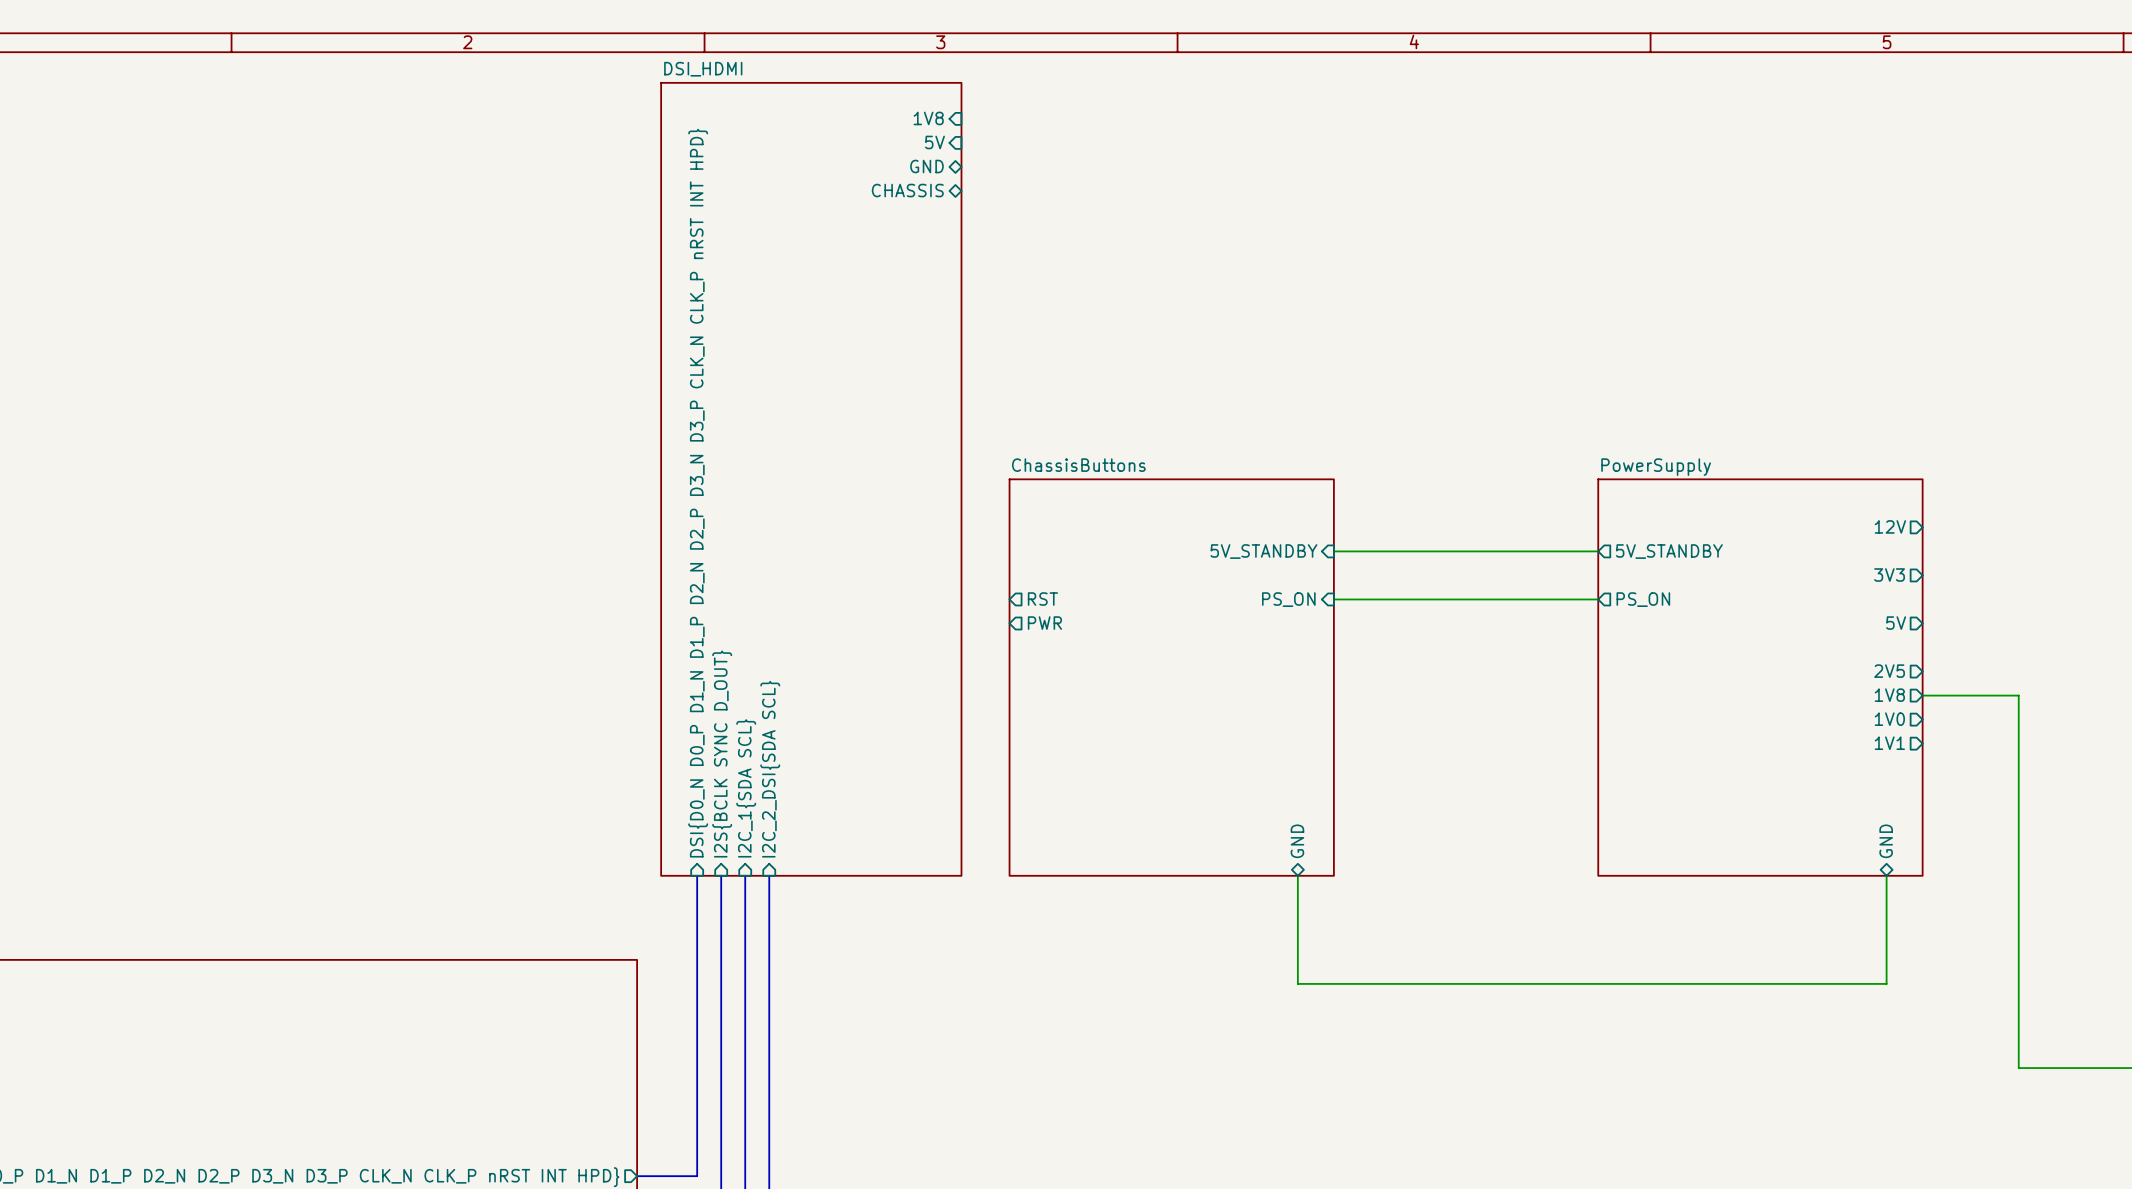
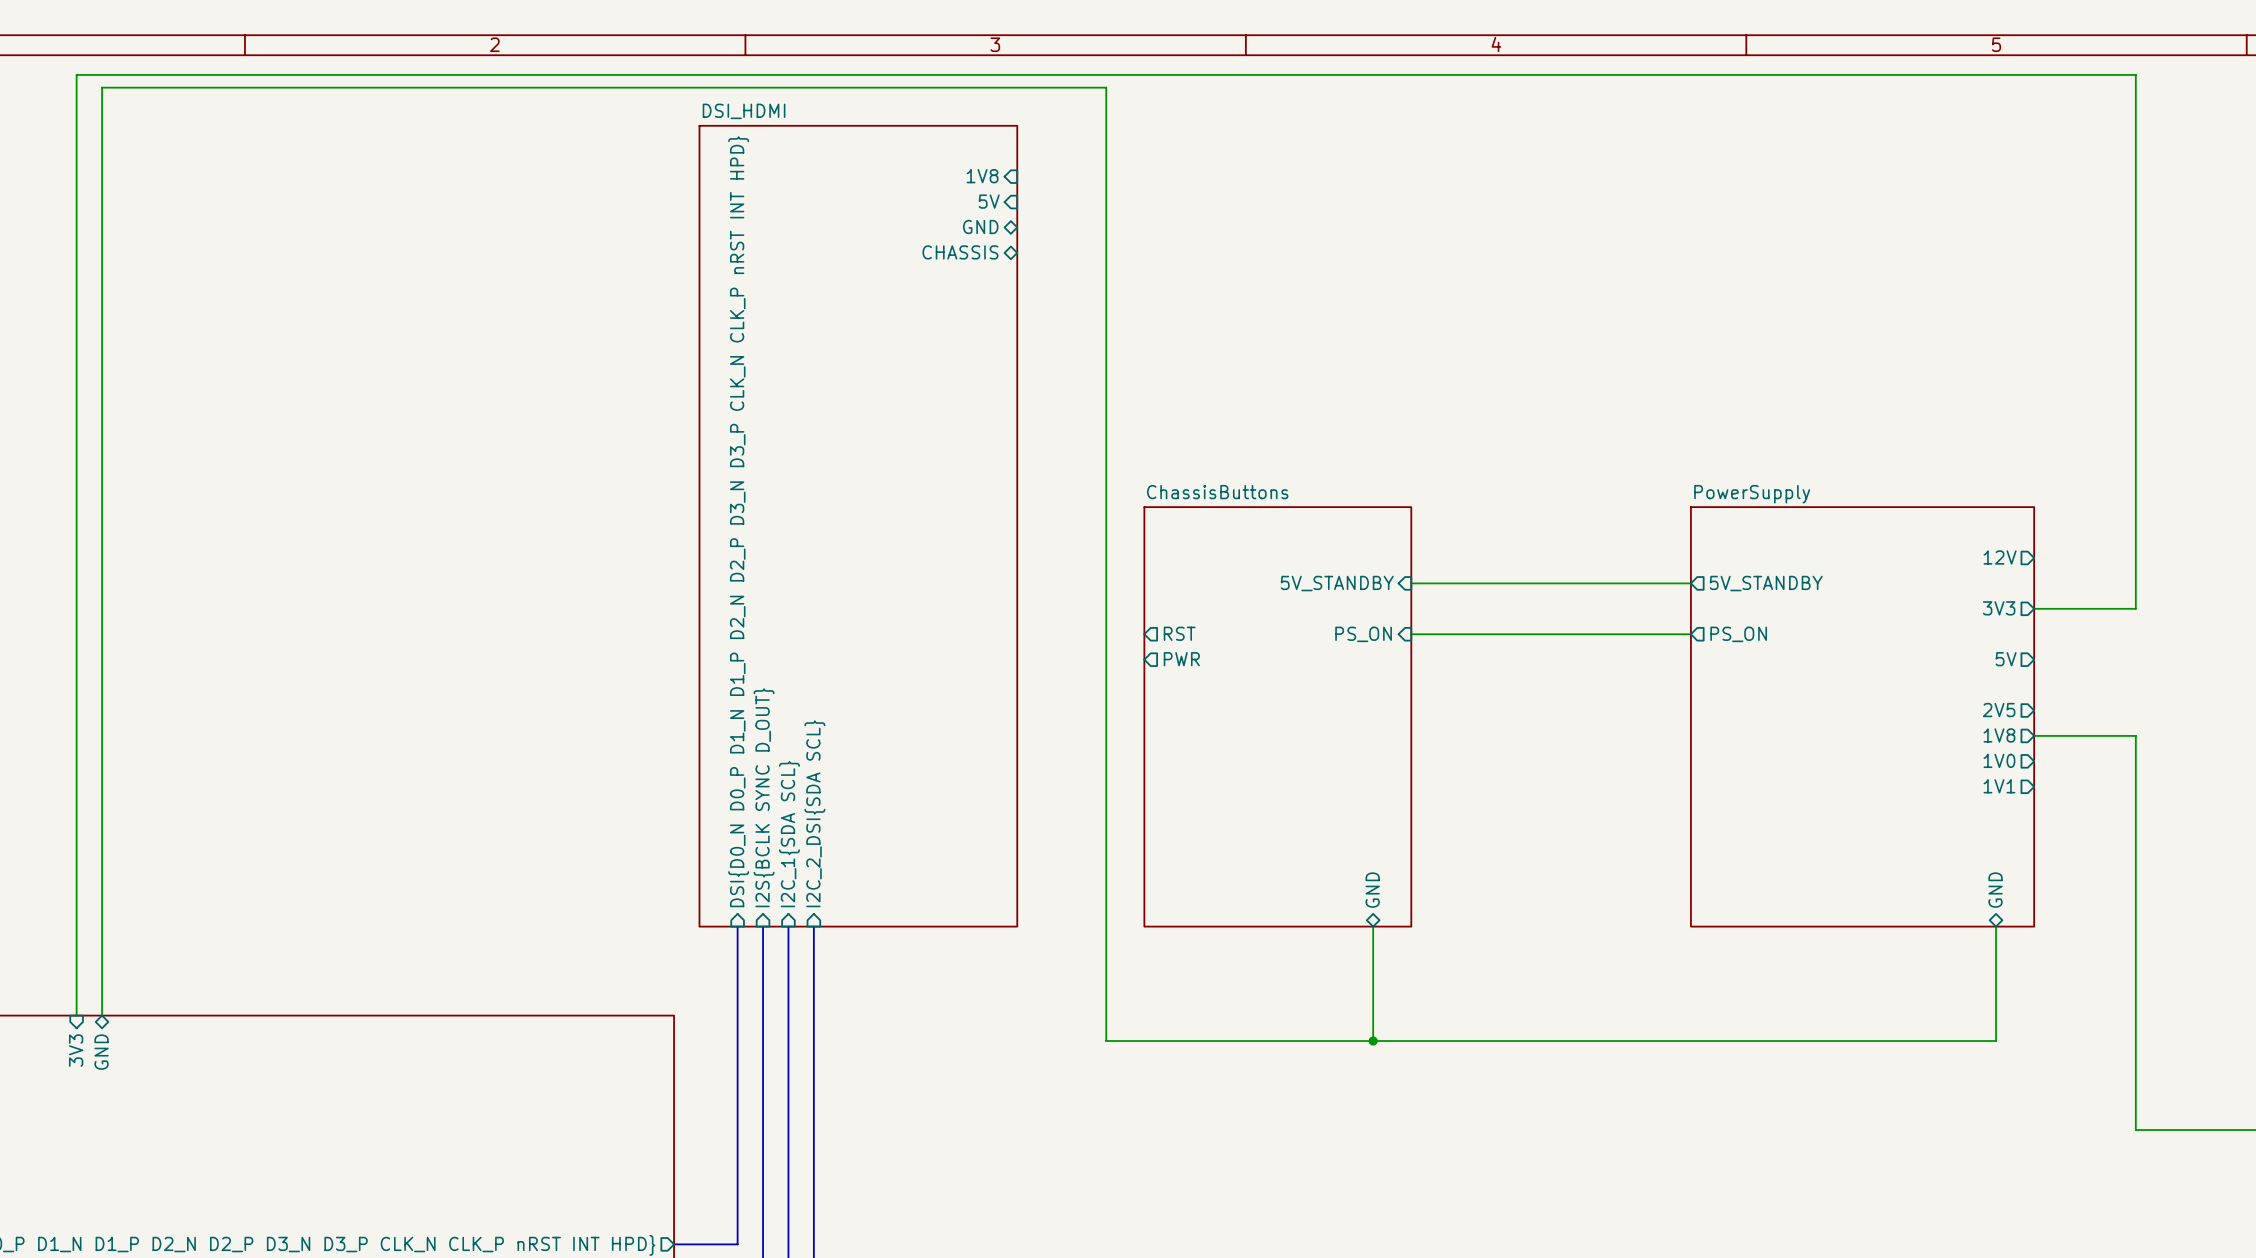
sheet pin: 1V8 (928, 118) -> none
sheet pin: 5V (934, 142) -> none
sheet pin shape: bidirectional (926, 166) -> input (982, 176)
sheet pin: GND (926, 166) -> 1V8 (982, 176)
sheet pin shape: bidirectional (907, 190) -> input (989, 201)
sheet pin: CHASSIS (907, 190) -> 5V (989, 201)
sheet pin: none -> GND (980, 227)
sheet pin: none -> CHASSIS (960, 252)
sheet DSI_HDMI: (811, 479) -> none
sheet DSI_HDMI: none -> (858, 526)
wire: none -> (2034, 608) (2135, 608) (2135, 74) (76, 74) (76, 1015)
sheet pin position: RST (1042, 599) -> RST (1179, 633)
sheet pin position: PWR (1044, 623) -> PWR (1181, 659)
sheet ChassisButtons: (1171, 677) -> none
sheet ChassisButtons: none -> (1277, 716)
wire: none -> (102, 1015) (102, 87) (1106, 87) (1106, 1041) (1373, 1041)
junction: none -> (1373, 1041)
sheet pin: none -> 3V3 (76, 1050)
sheet pin: none -> GND (101, 1052)

